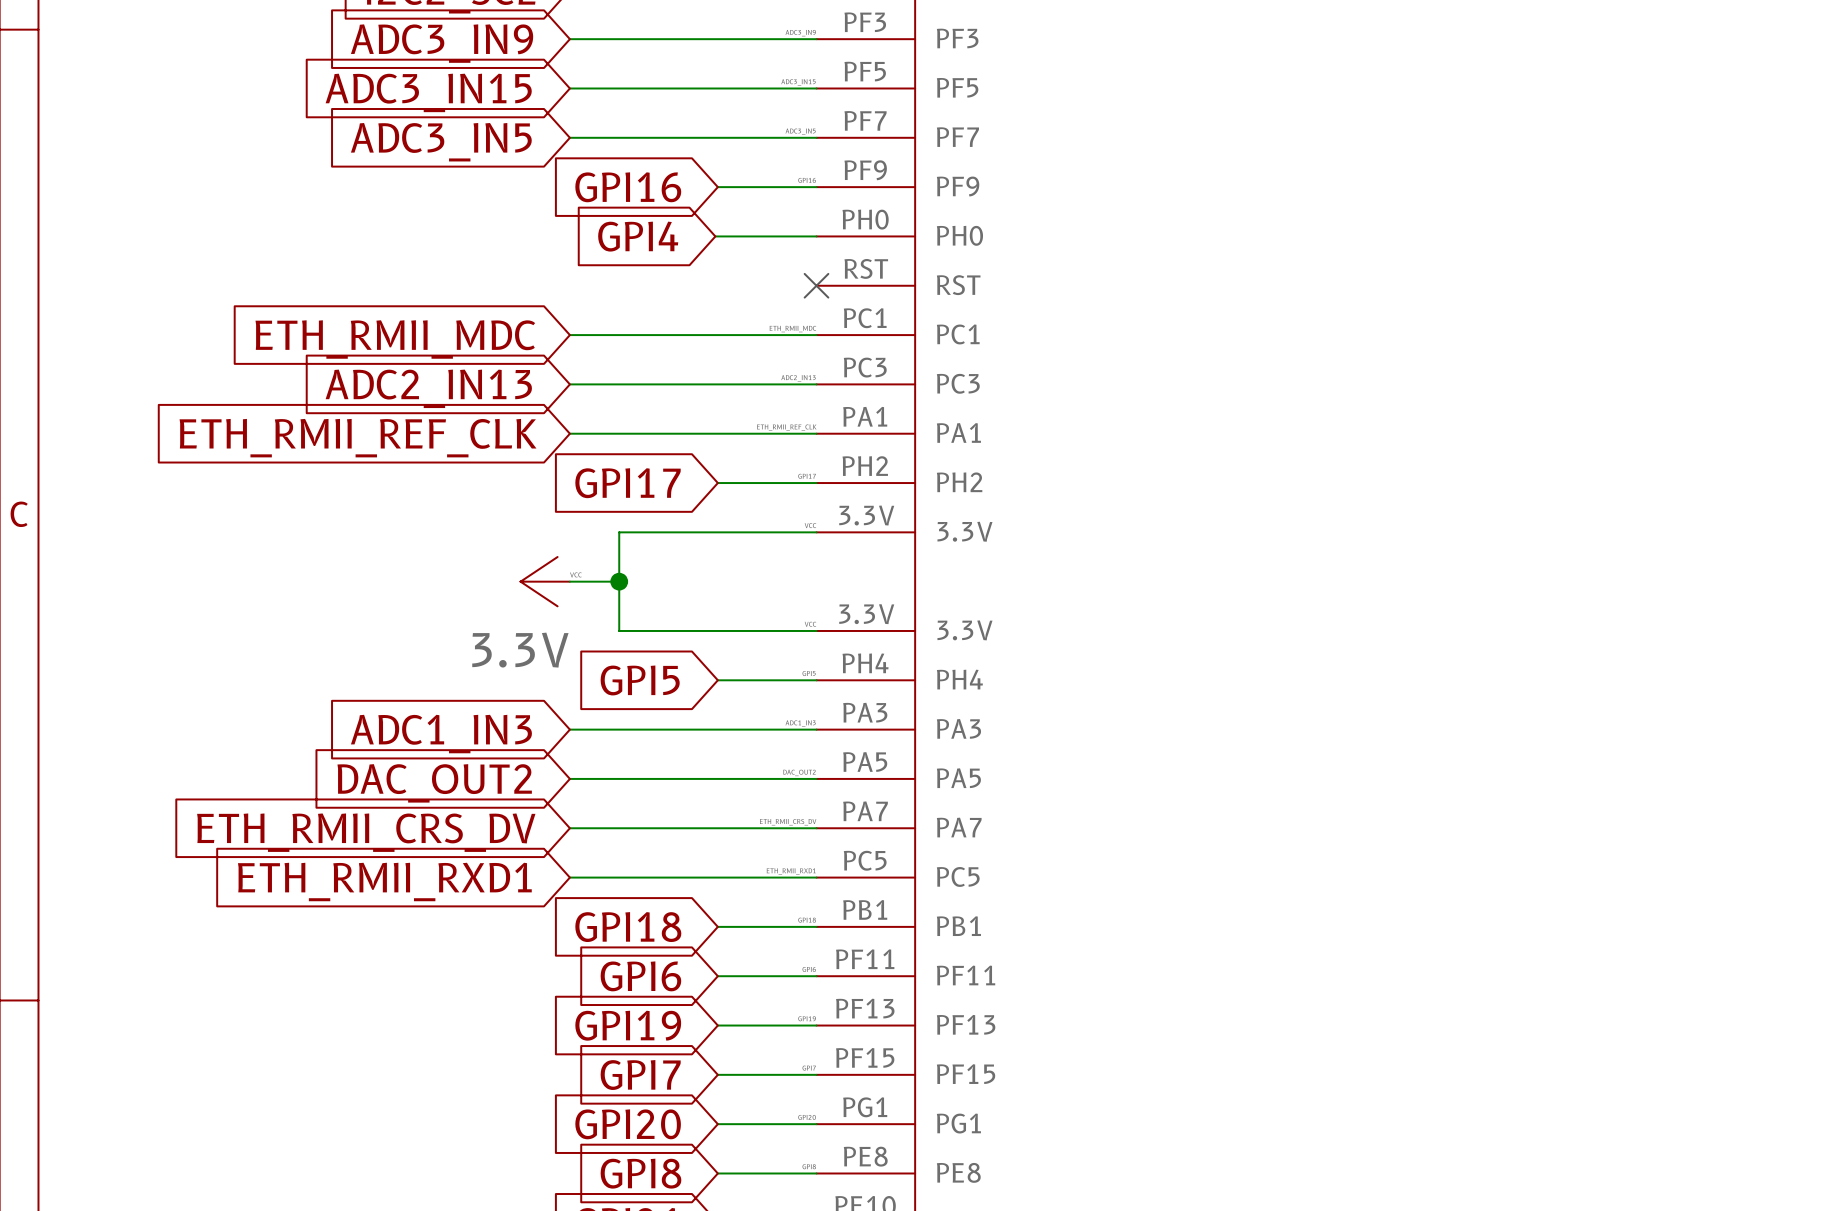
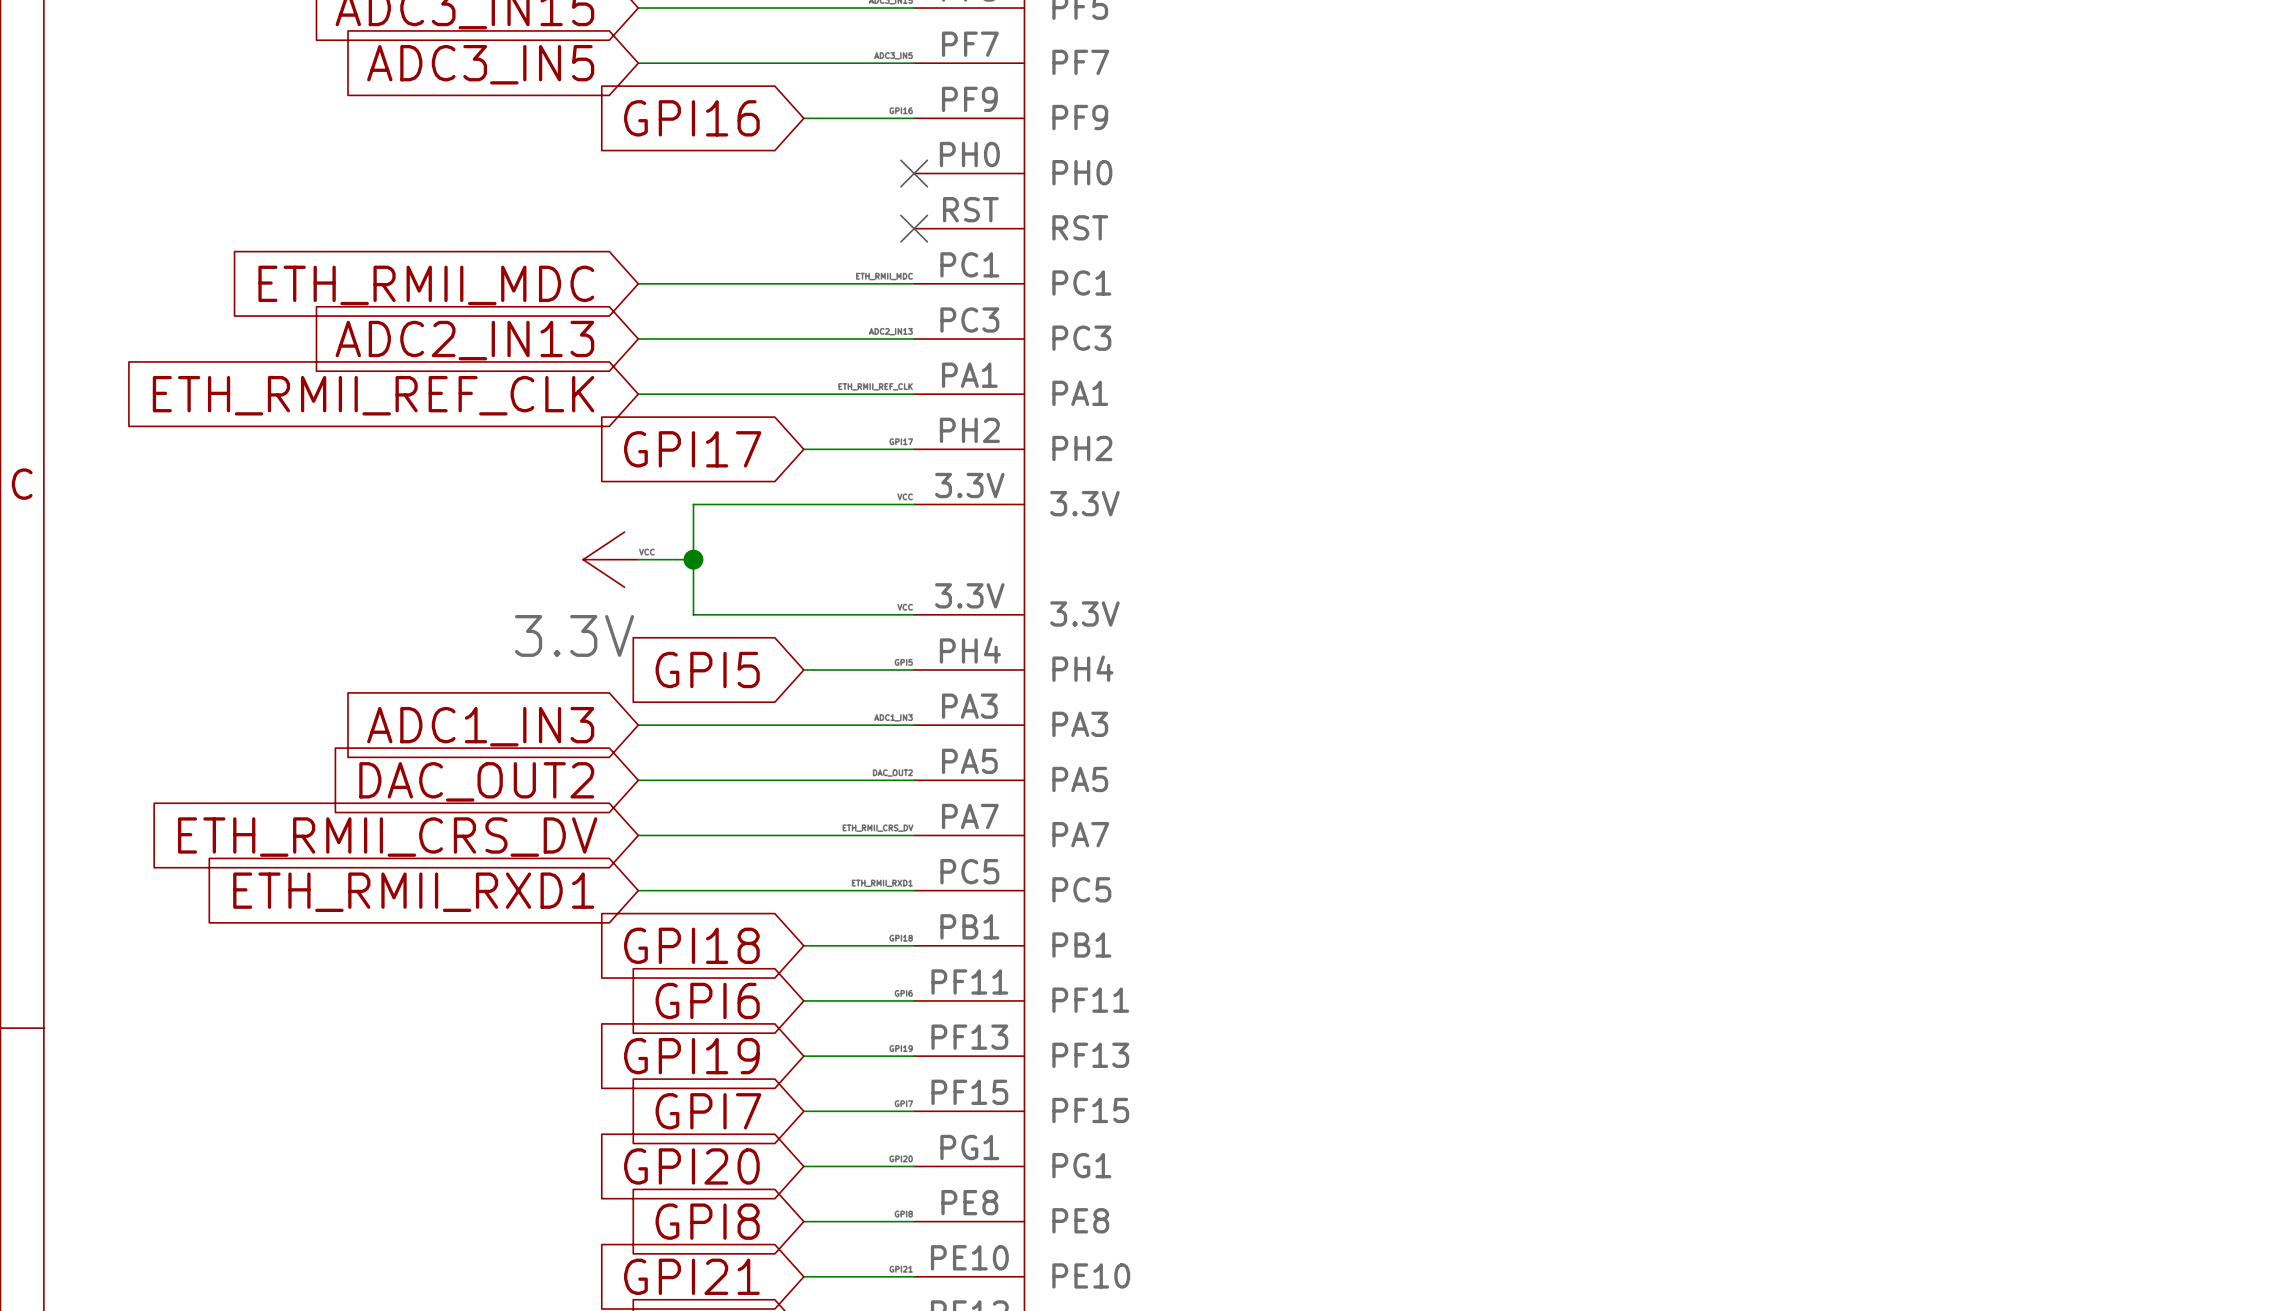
global label: GPI4 (638, 236) -> none
wire: (715, 236) (816, 236) -> none
no-connect mark: none -> (914, 173)

